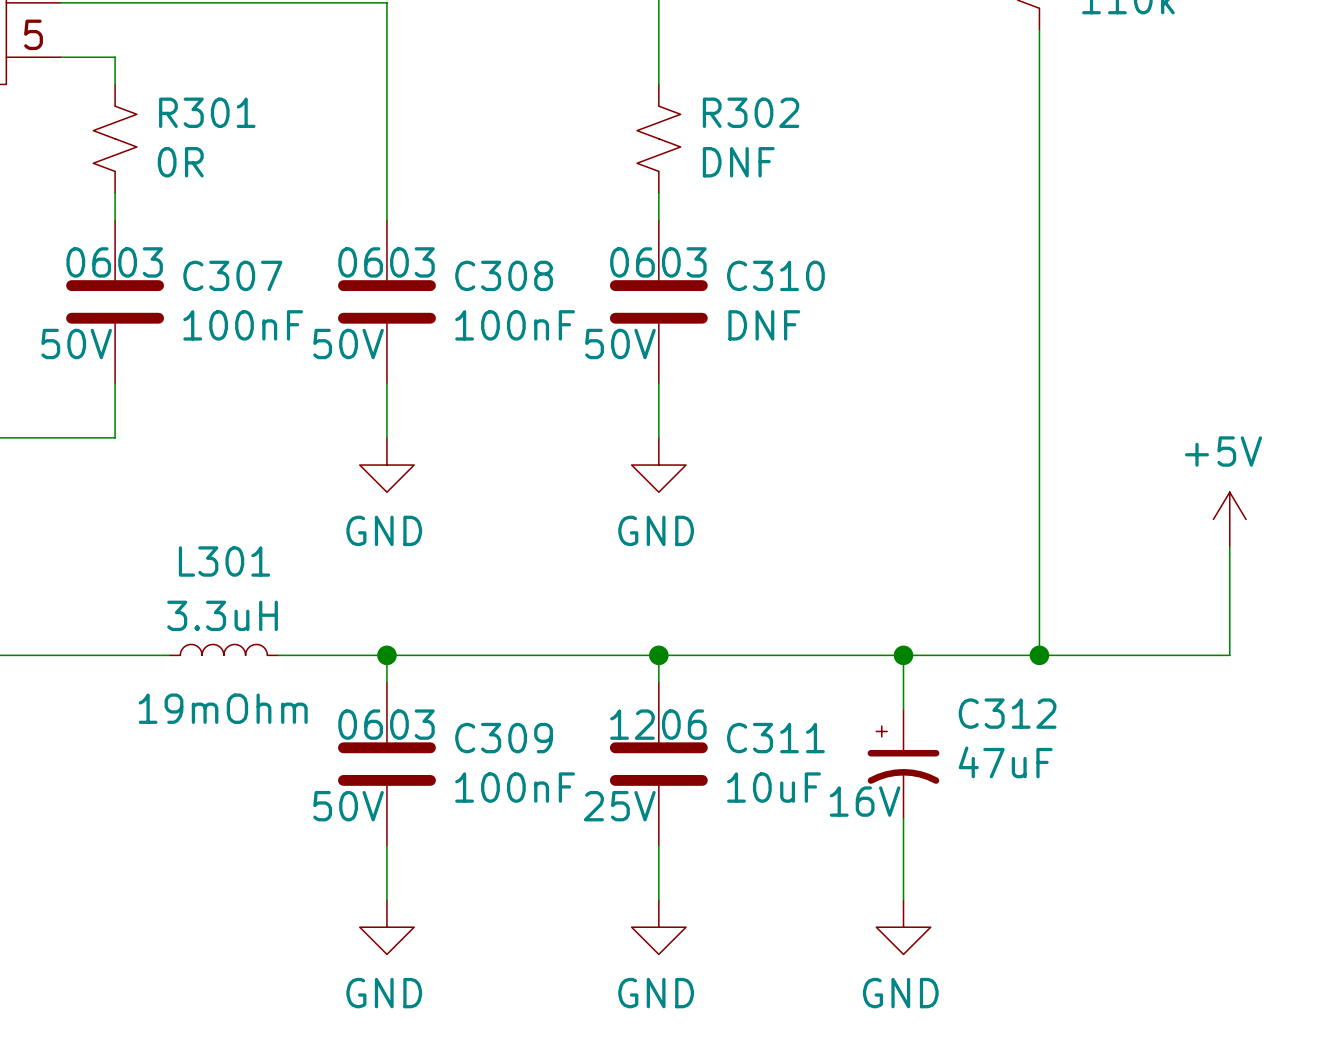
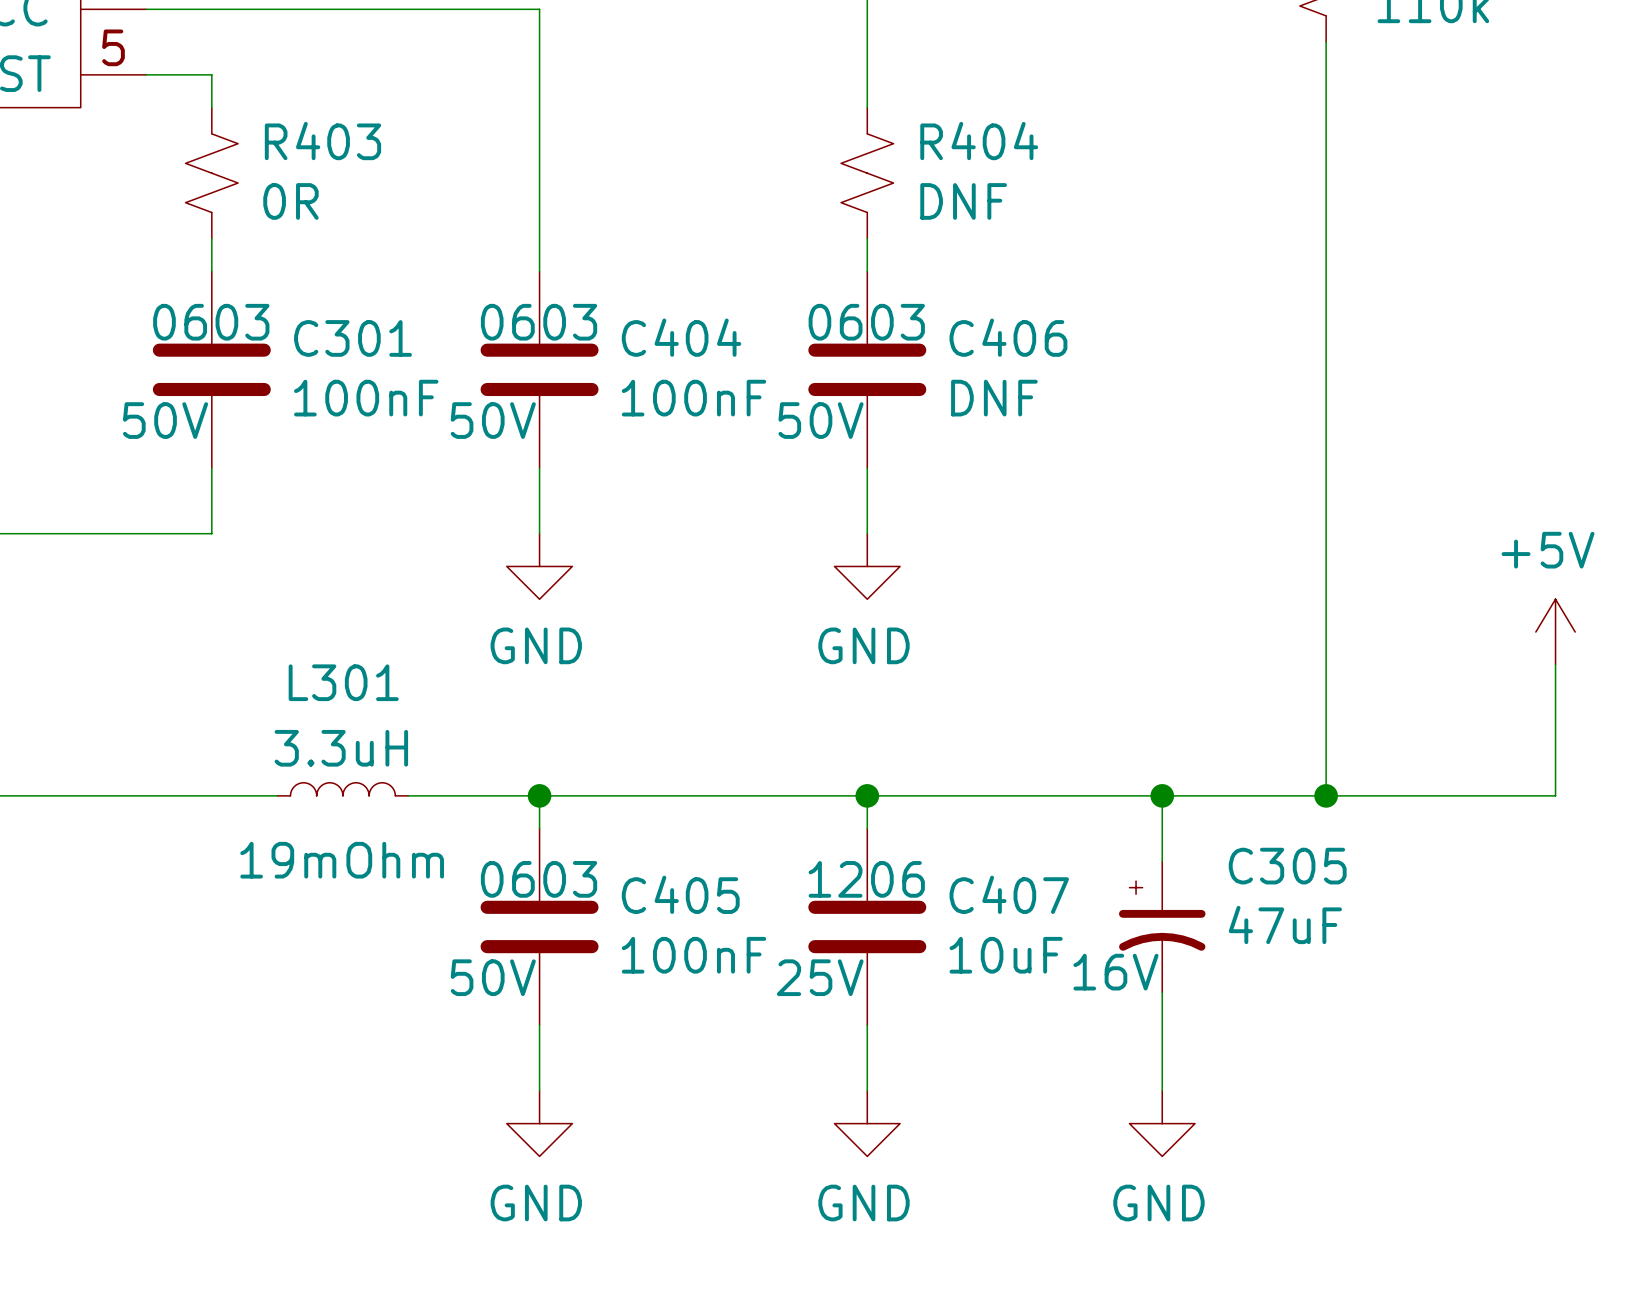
R301 name: R301 (207, 112) -> R403 (322, 141)
R302 name: R302 (751, 112) -> R404 (979, 141)
C307 name: C307 (232, 275) -> C301 (352, 338)
C308 name: C308 (504, 275) -> C404 (681, 337)
C310 name: C310 (775, 275) -> C406 (1008, 337)
C312 name: C312 (1007, 713) -> C305 (1287, 866)
C309 name: C309 (504, 738) -> C405 (680, 894)
C311 name: C311 (775, 738) -> C407 (1009, 894)

